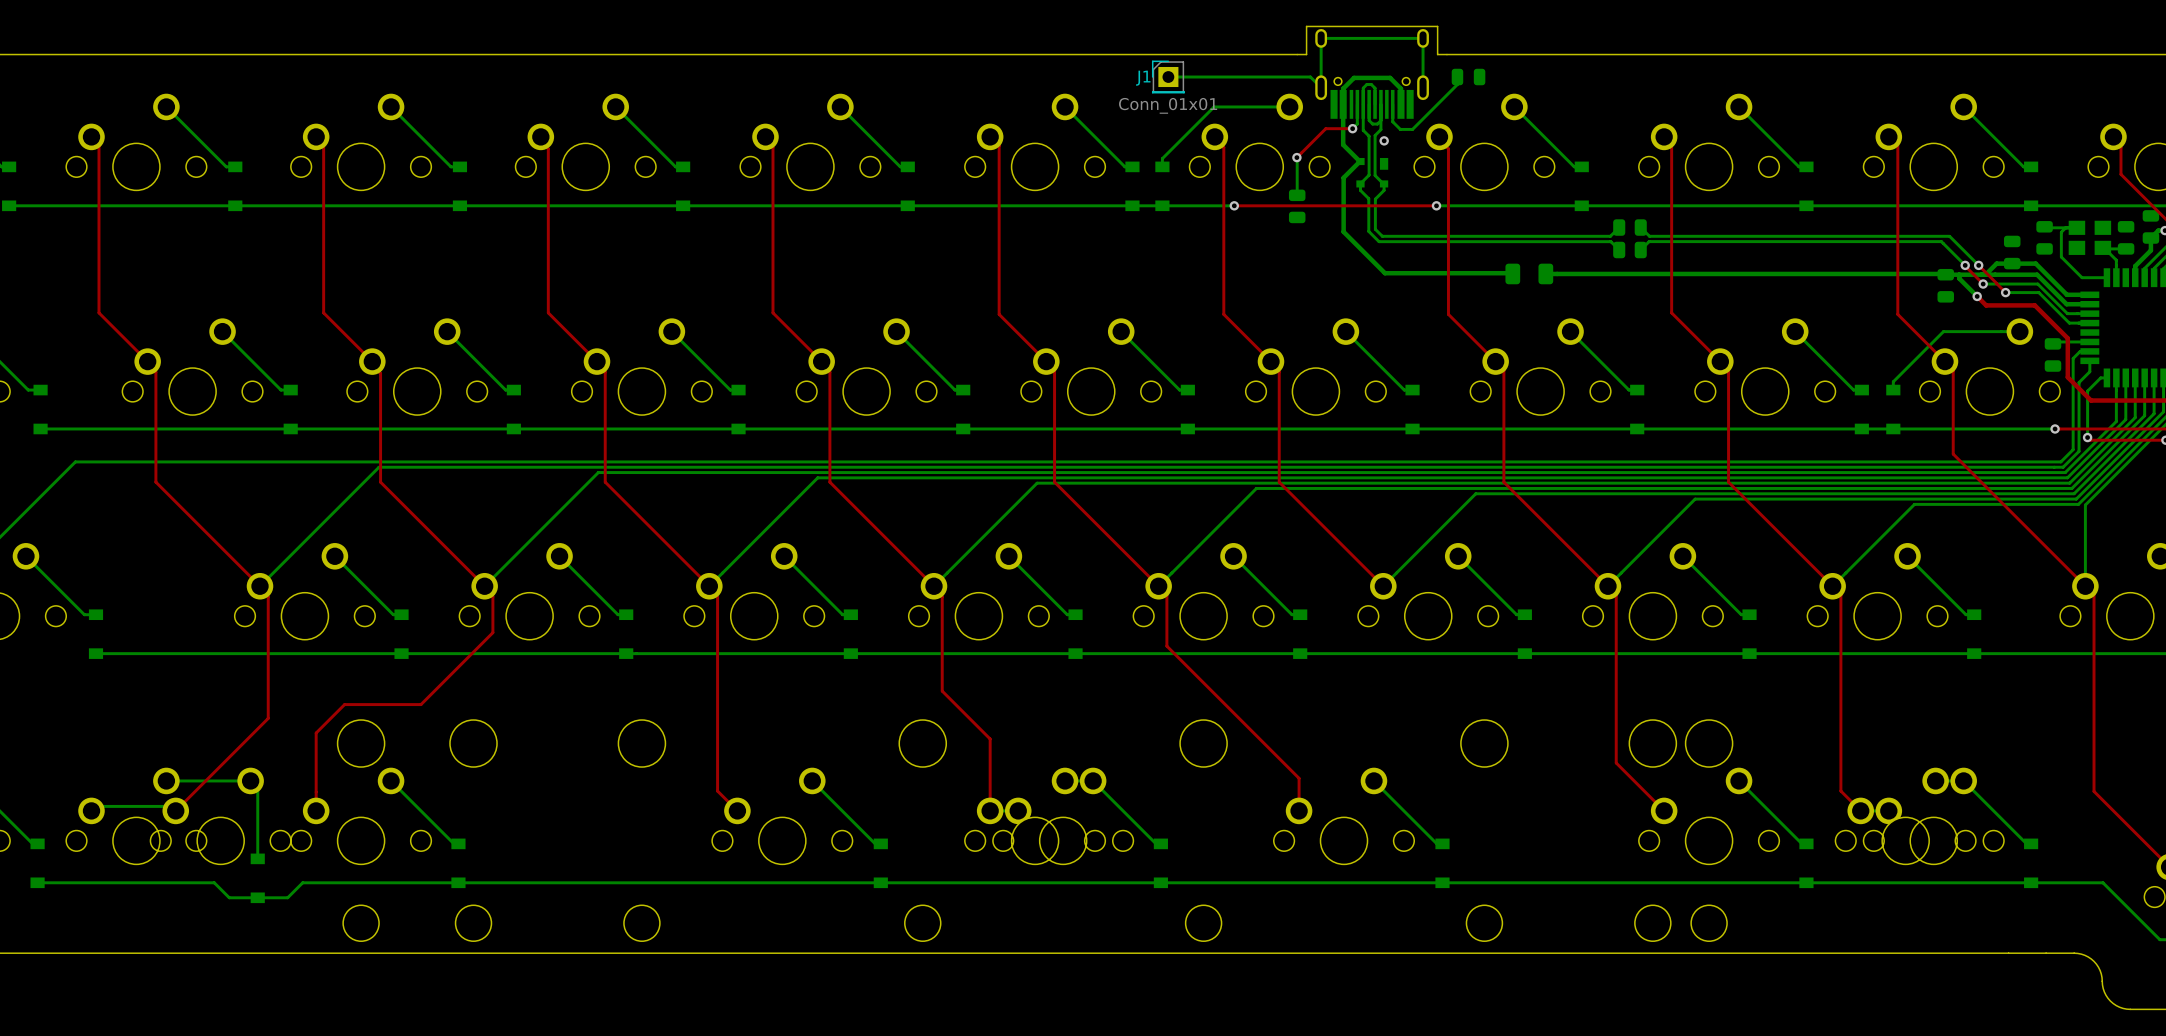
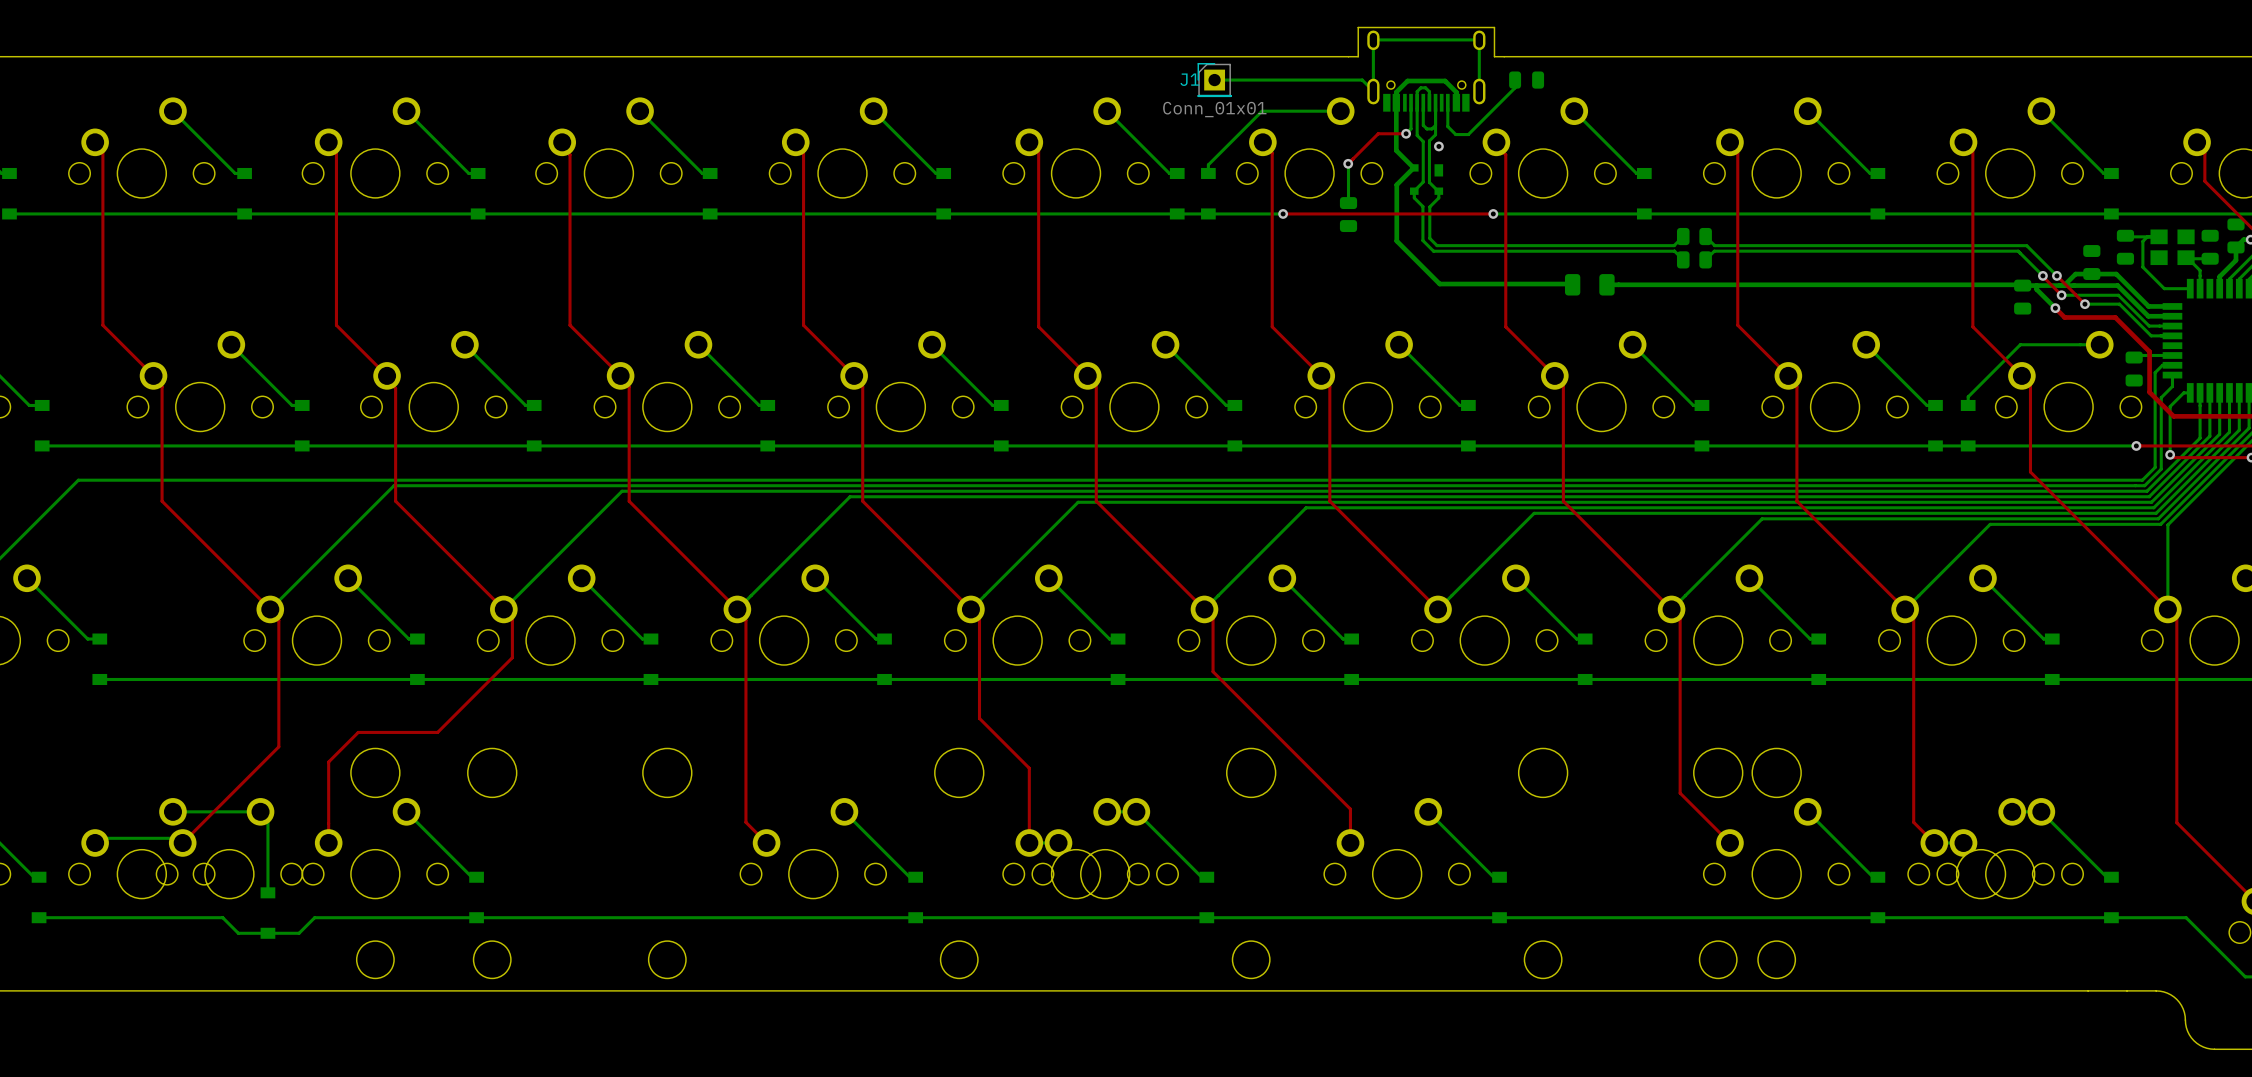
part footprint: [1315, 28, 1429, 119] -> [1367, 30, 1486, 112]

